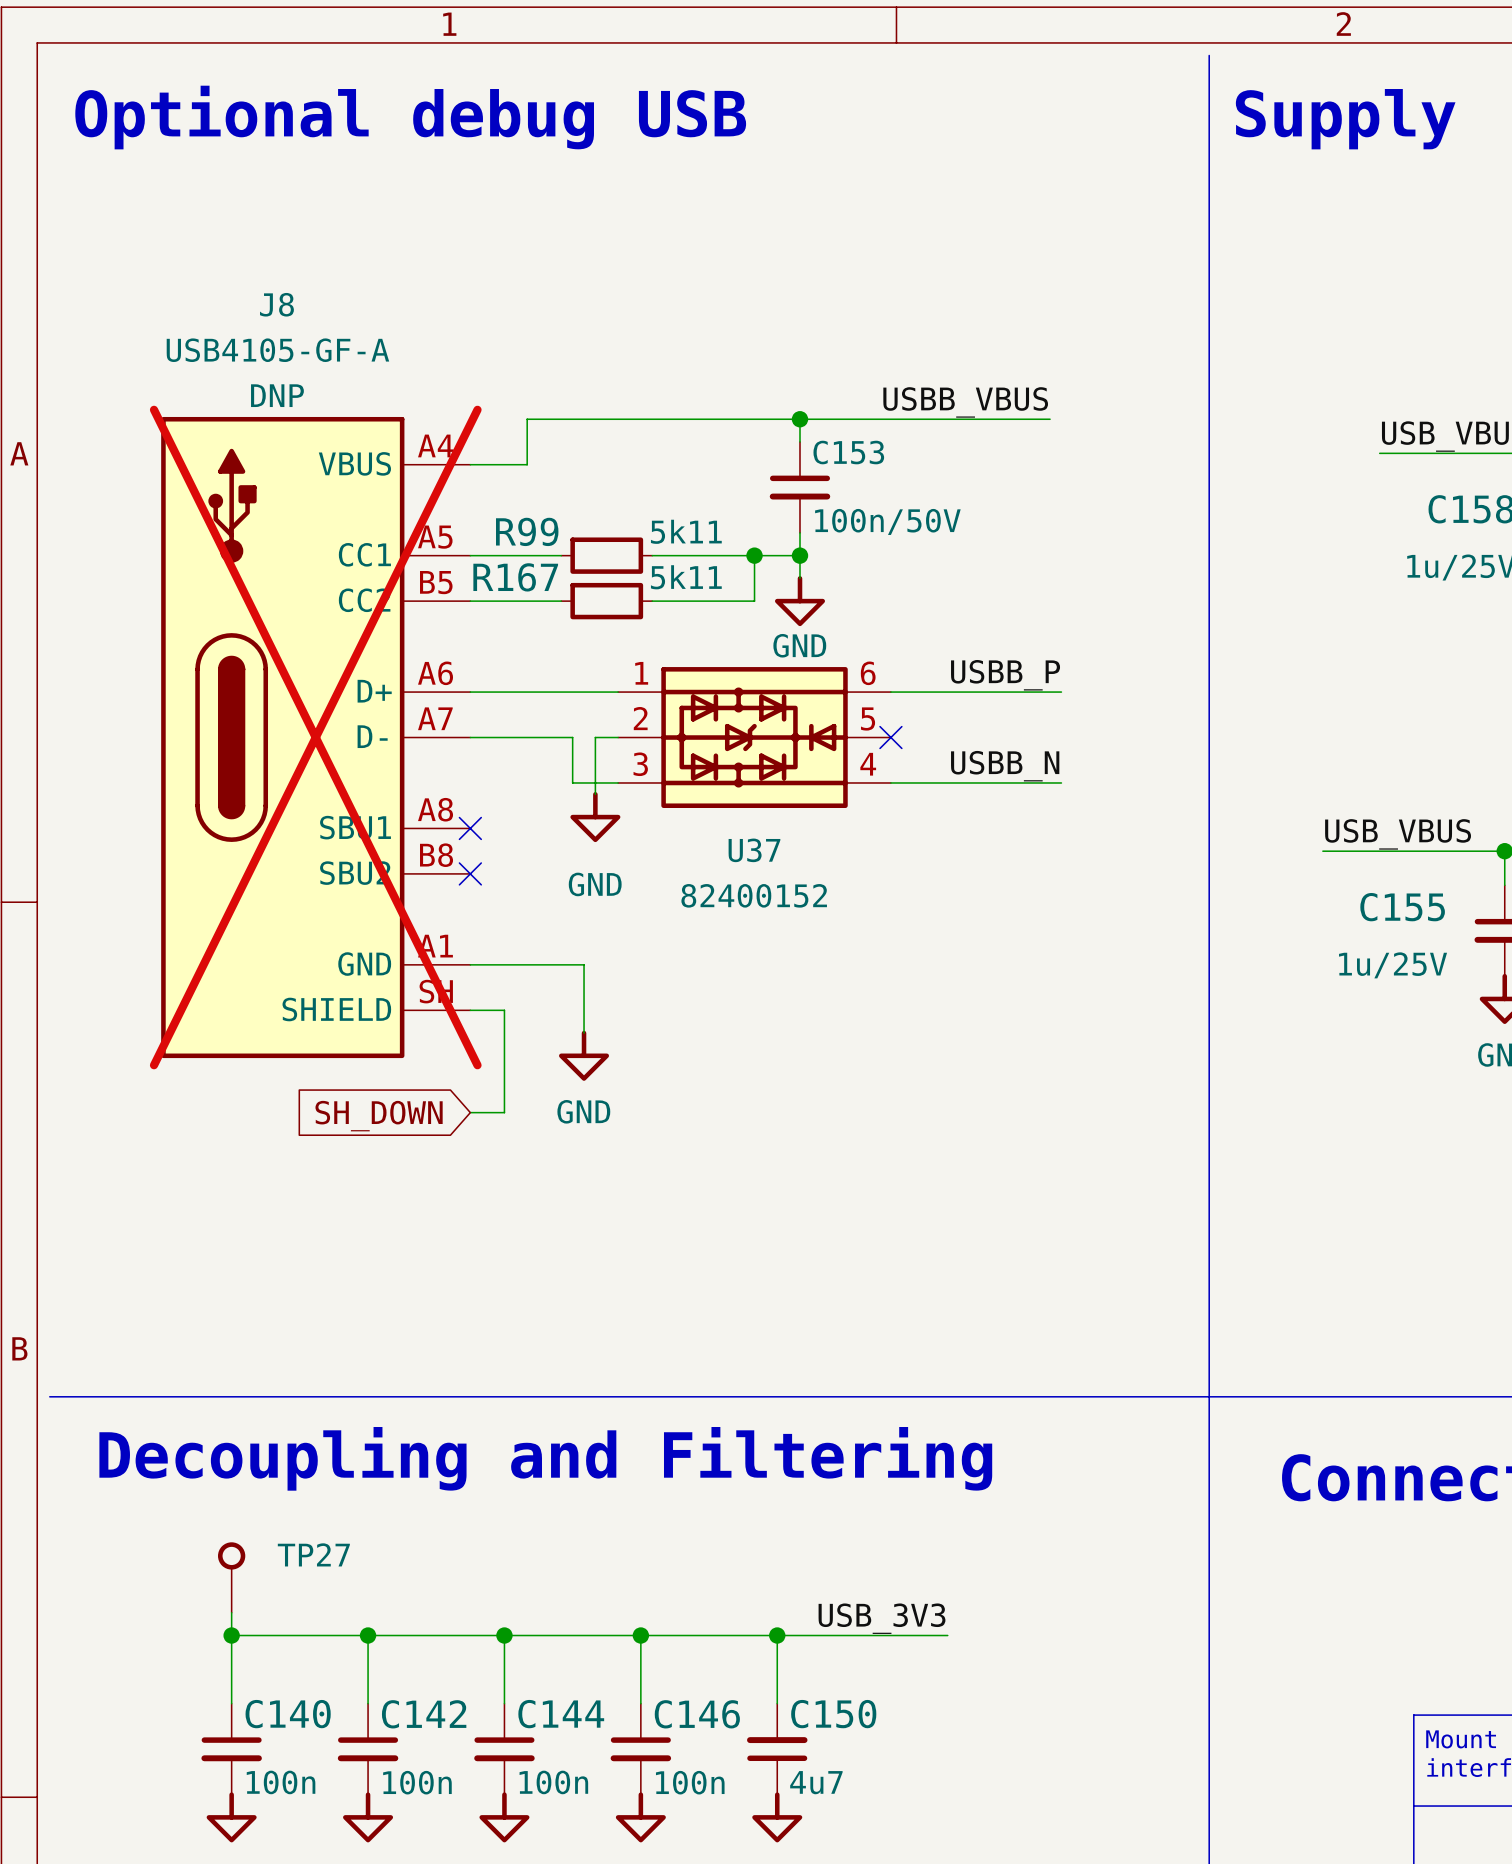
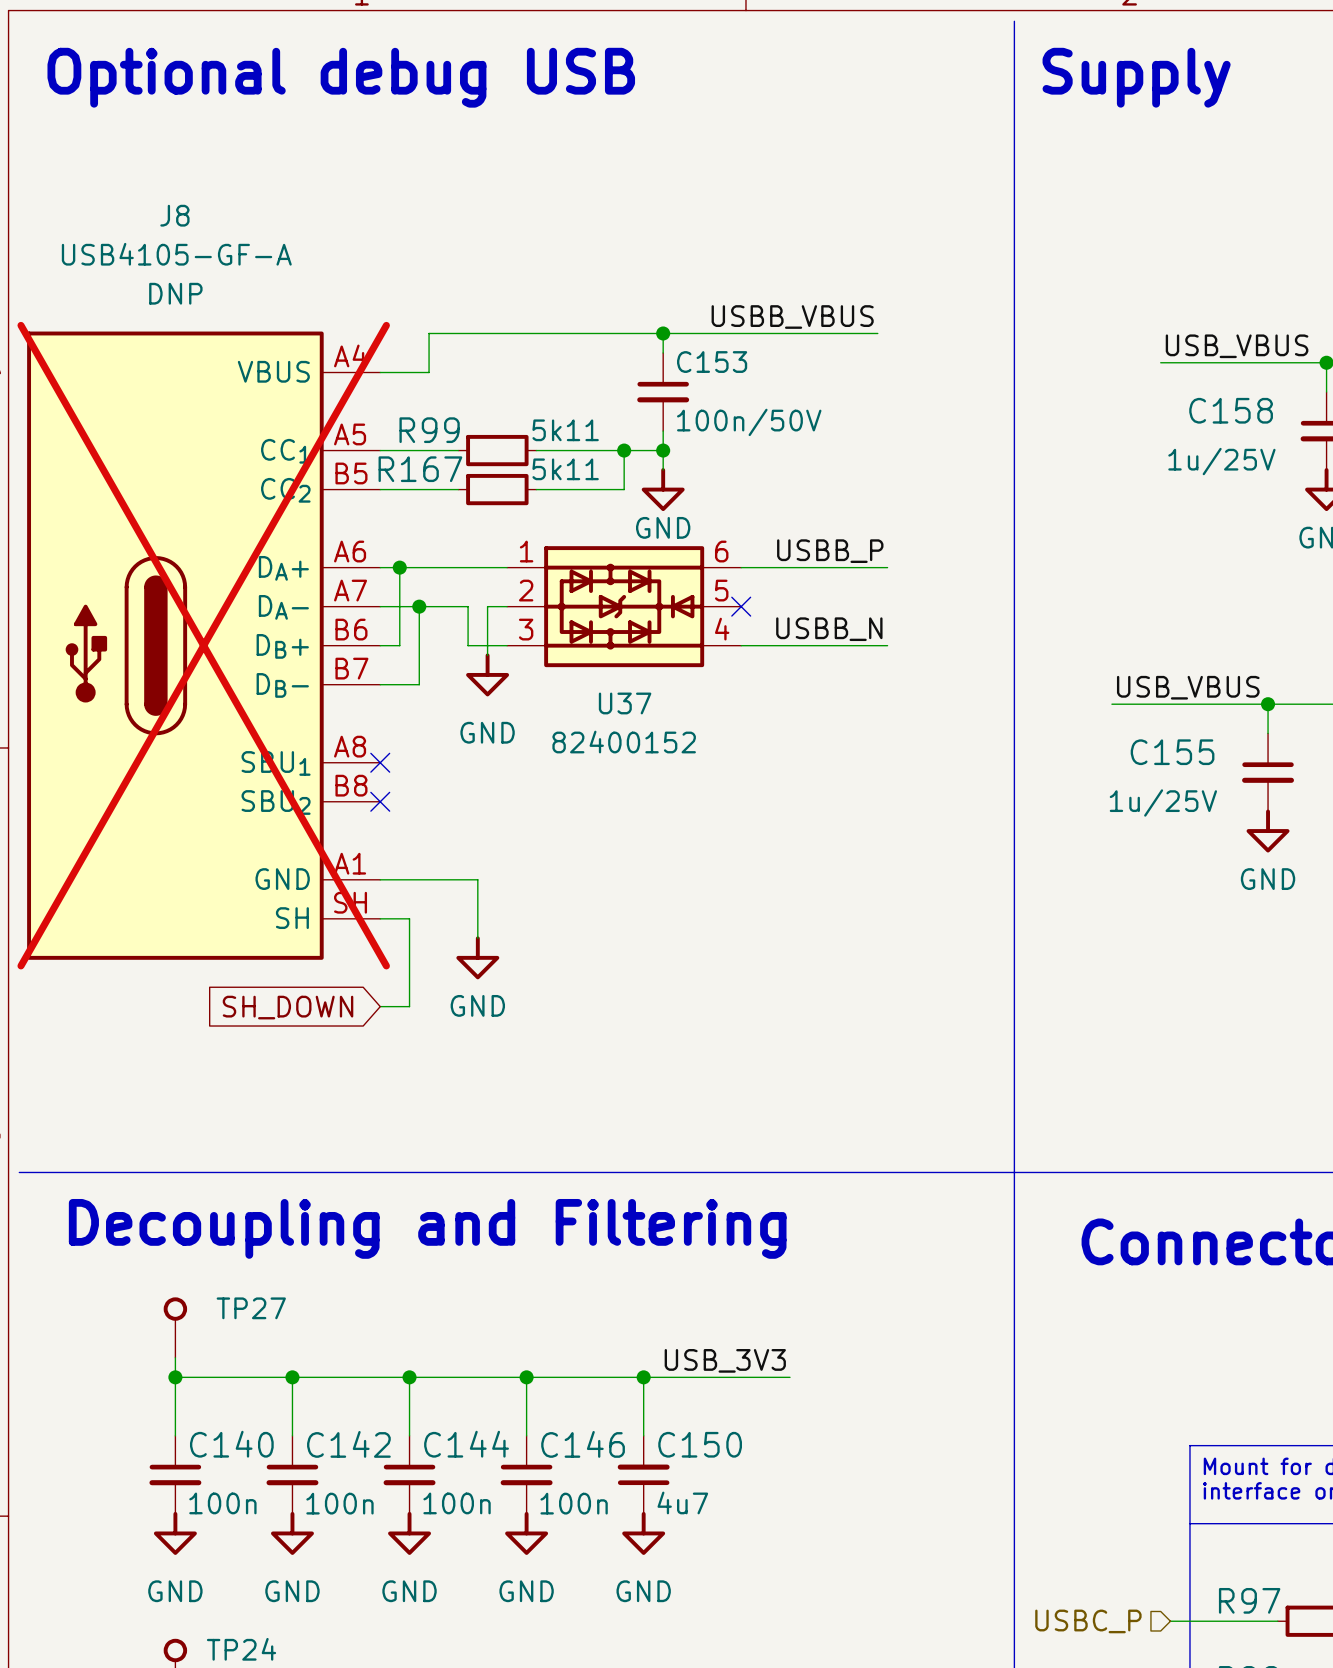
J8 name position: J8 (276, 304) -> J8 (174, 215)
J8 text position: USB4105-GF-A (277, 350) -> USB4105-GF-A (176, 254)
J8 text position: DNP (277, 395) -> DNP (175, 293)
J8 symbol: [161, 416, 471, 1059] -> [27, 331, 381, 960]
wire: none -> (399, 567) (399, 645) (380, 645)
junction: none -> (399, 567)
wire: none -> (419, 606) (419, 684) (380, 684)
junction: none -> (419, 606)
no-connect mark: (470, 828) -> none
no-connect mark: (470, 873) -> none
no-connect mark: none -> (380, 762)
wire: (470, 964) (584, 964) (584, 1033) -> (380, 879) (477, 879) (477, 938)
no-connect mark: none -> (380, 801)
wire: (470, 1010) (504, 1010) (504, 1101) -> (380, 918) (409, 918)
power symbol position: GND (584, 1055) -> GND (477, 957)
wire: (470, 1112) (504, 1112) -> (380, 1006) (409, 1006) (409, 928)
global label position: SH_DOWN (379, 1116) -> SH_DOWN (288, 1007)

